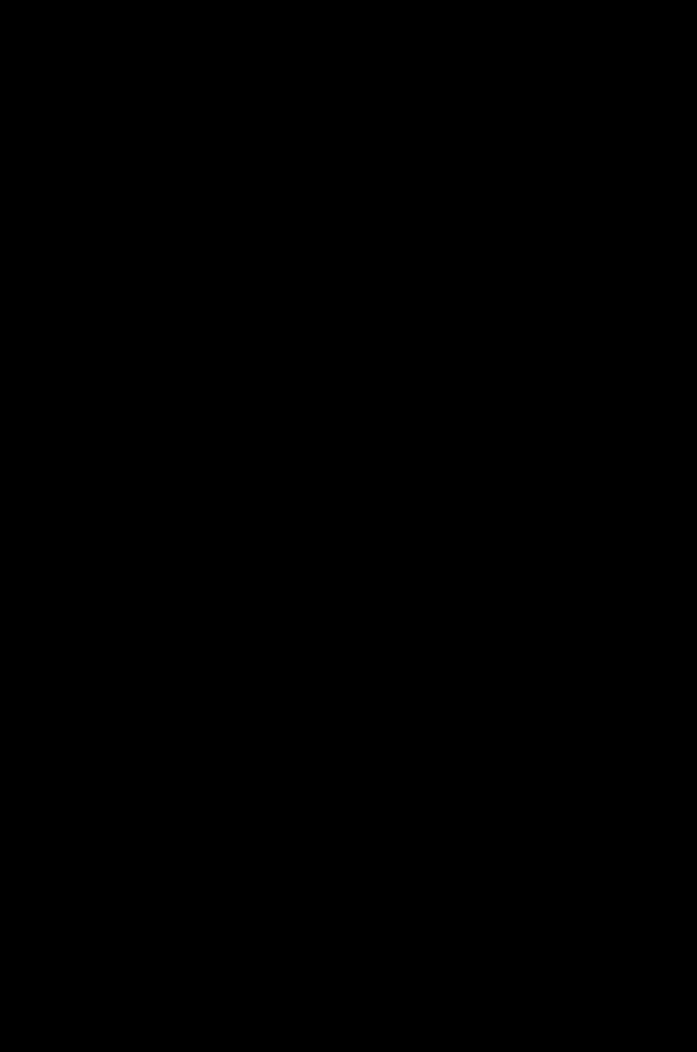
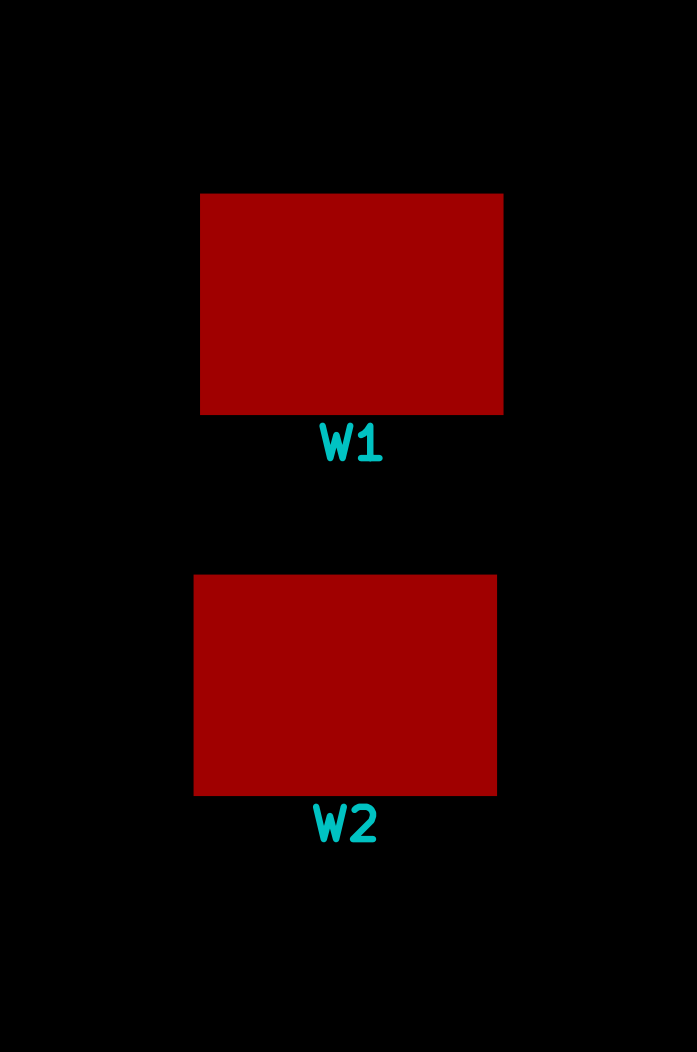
W1: none -> (351, 304)
W2: none -> (345, 685)

